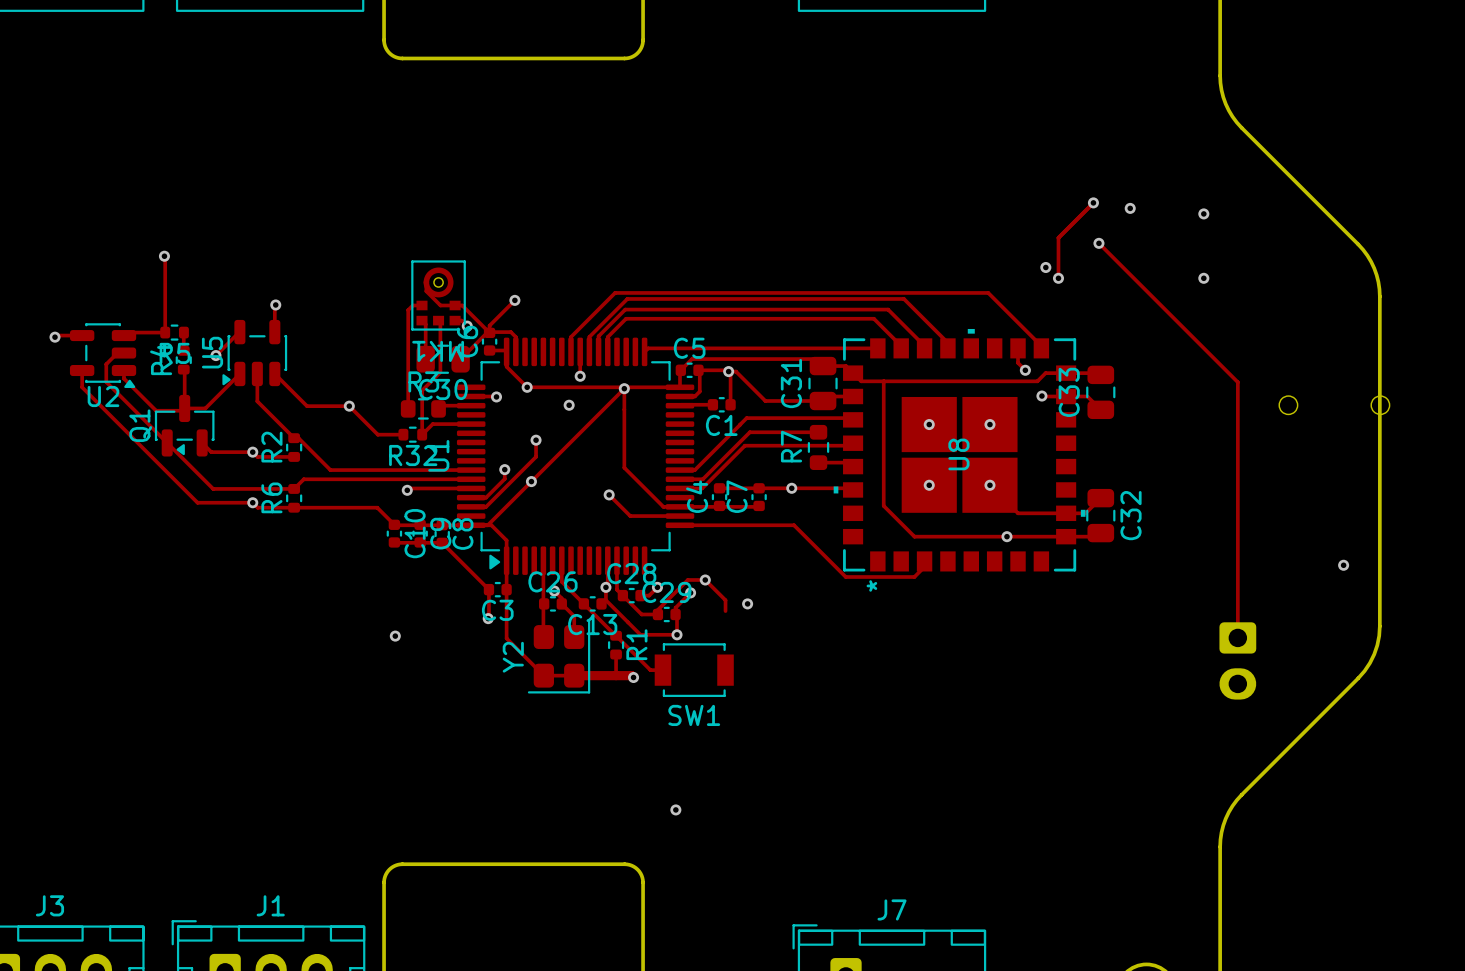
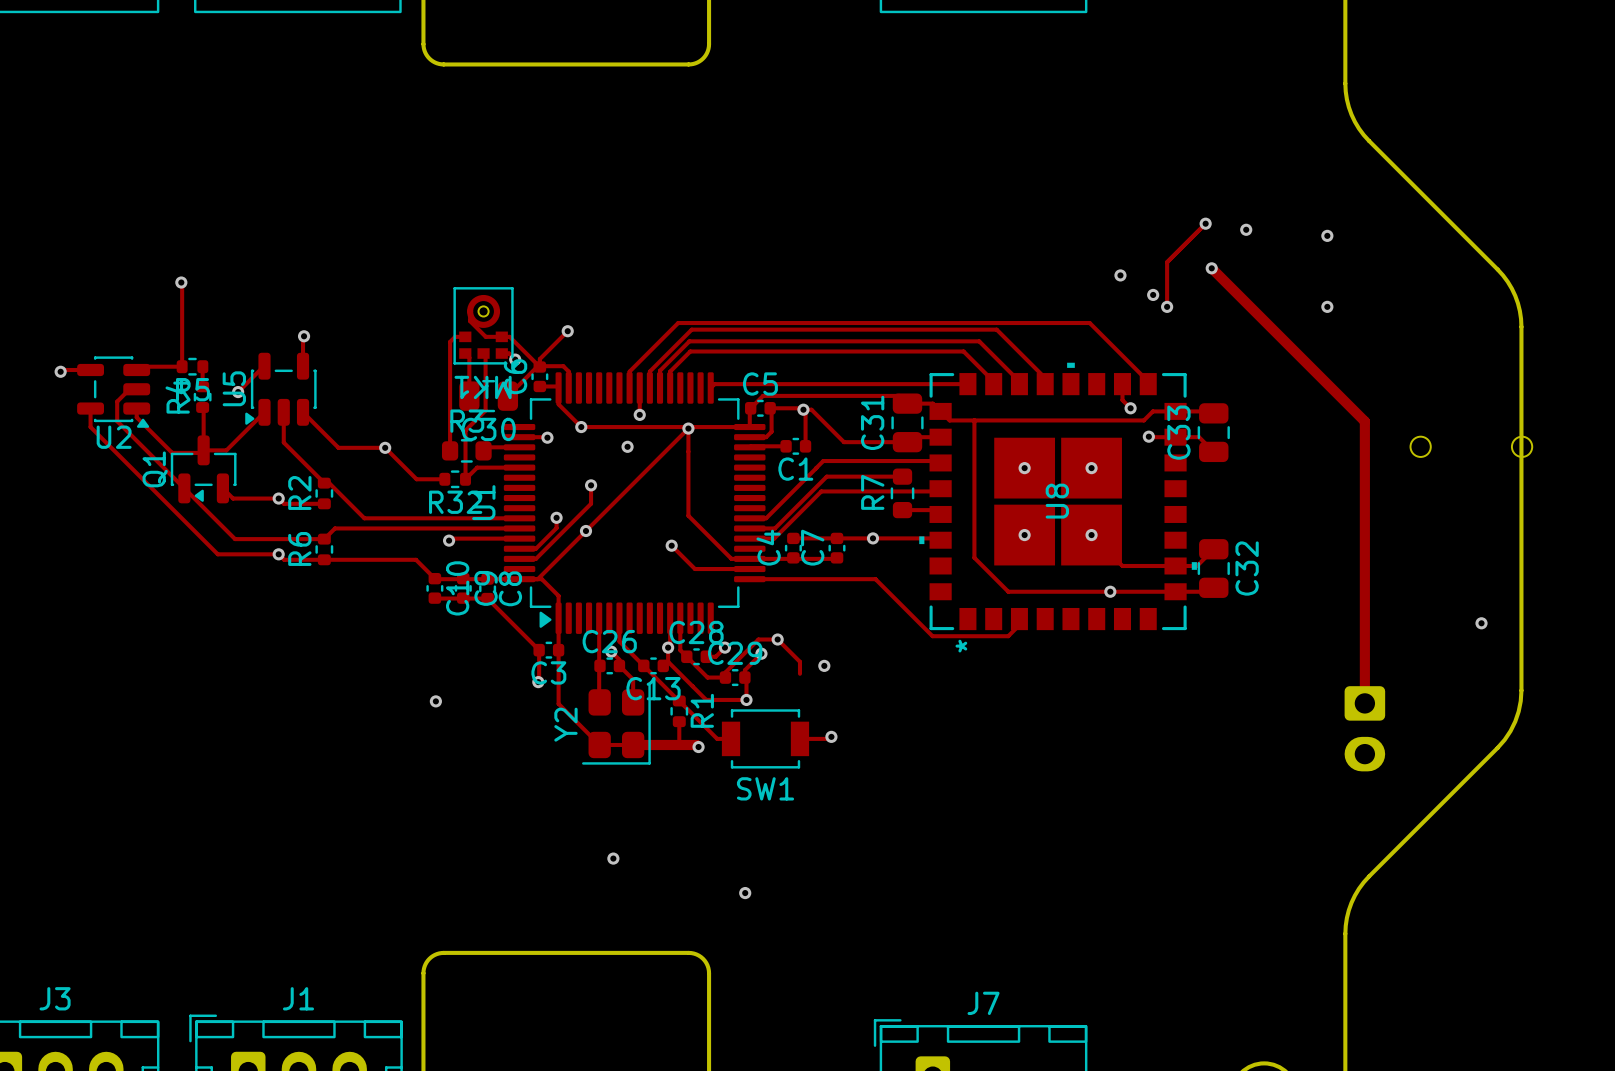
track width: thin (1098, 243) (1237, 382) (1237, 637) -> thick (1211, 268) (1364, 421) (1364, 703)
via: none -> (1120, 275)
track: none -> (831, 736) (829, 738) (799, 738)
via: none -> (831, 736)
via: none -> (613, 858)

